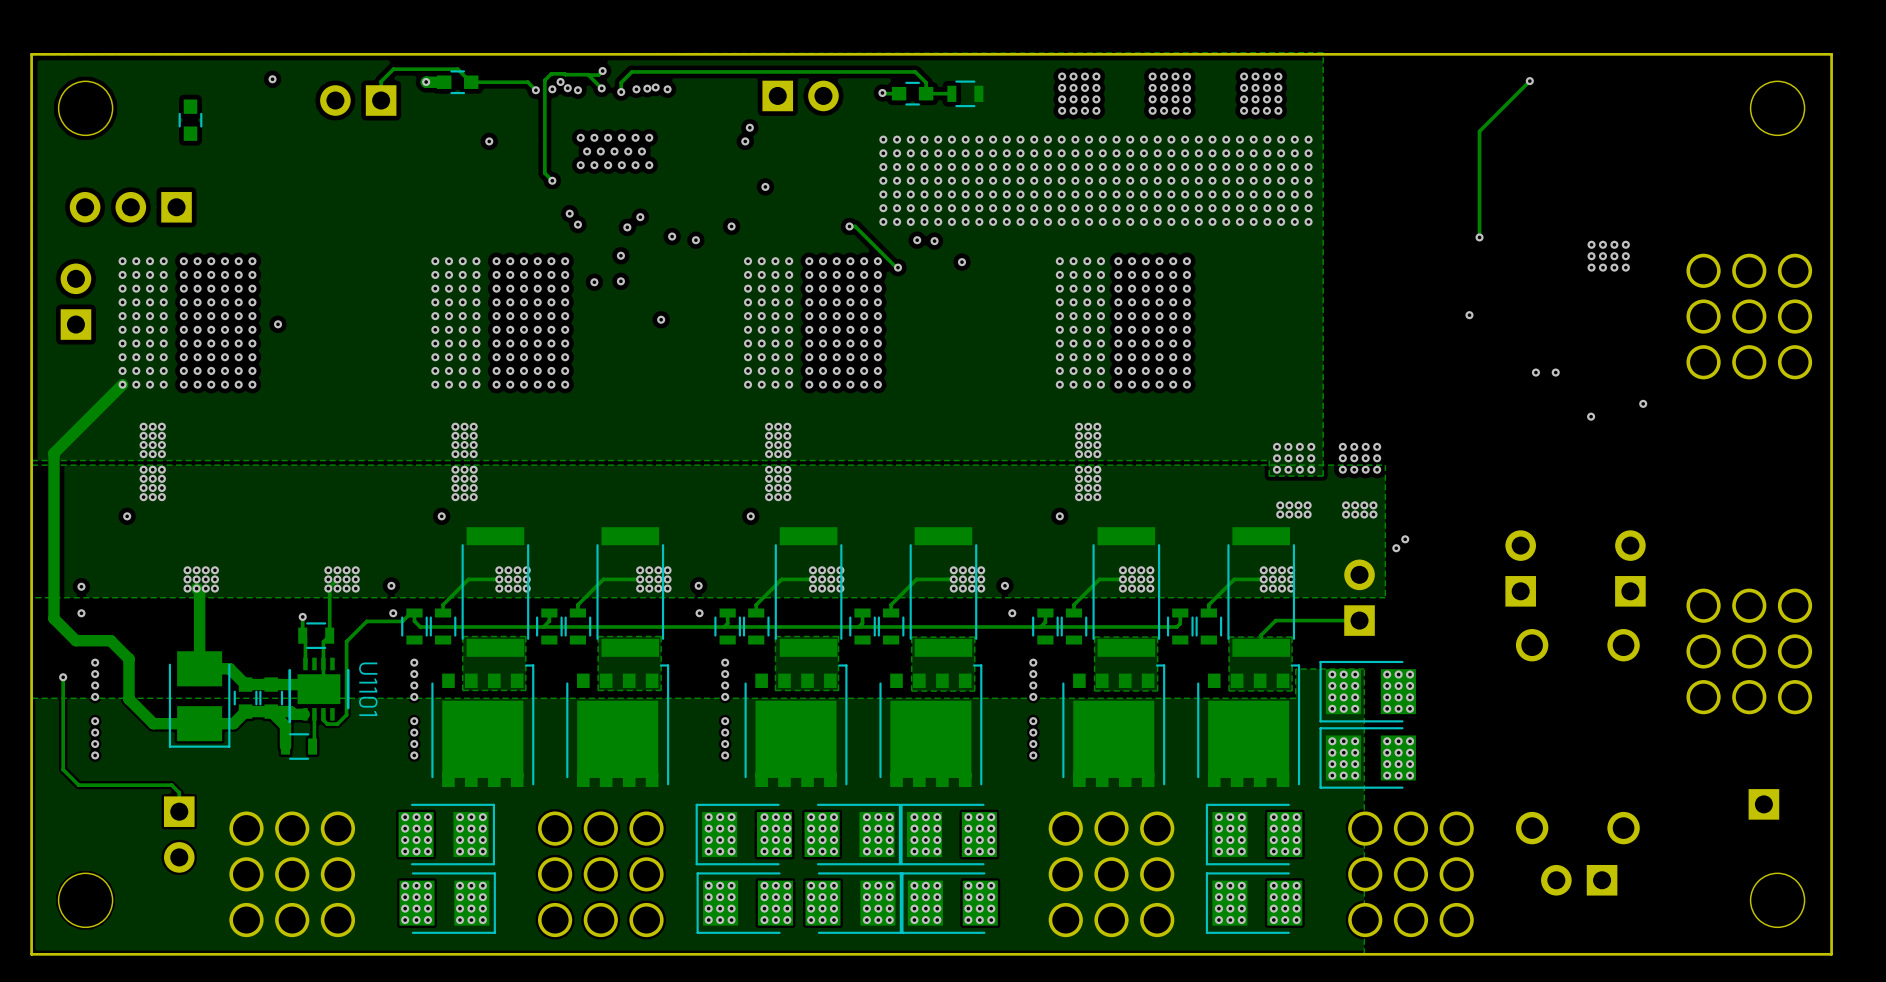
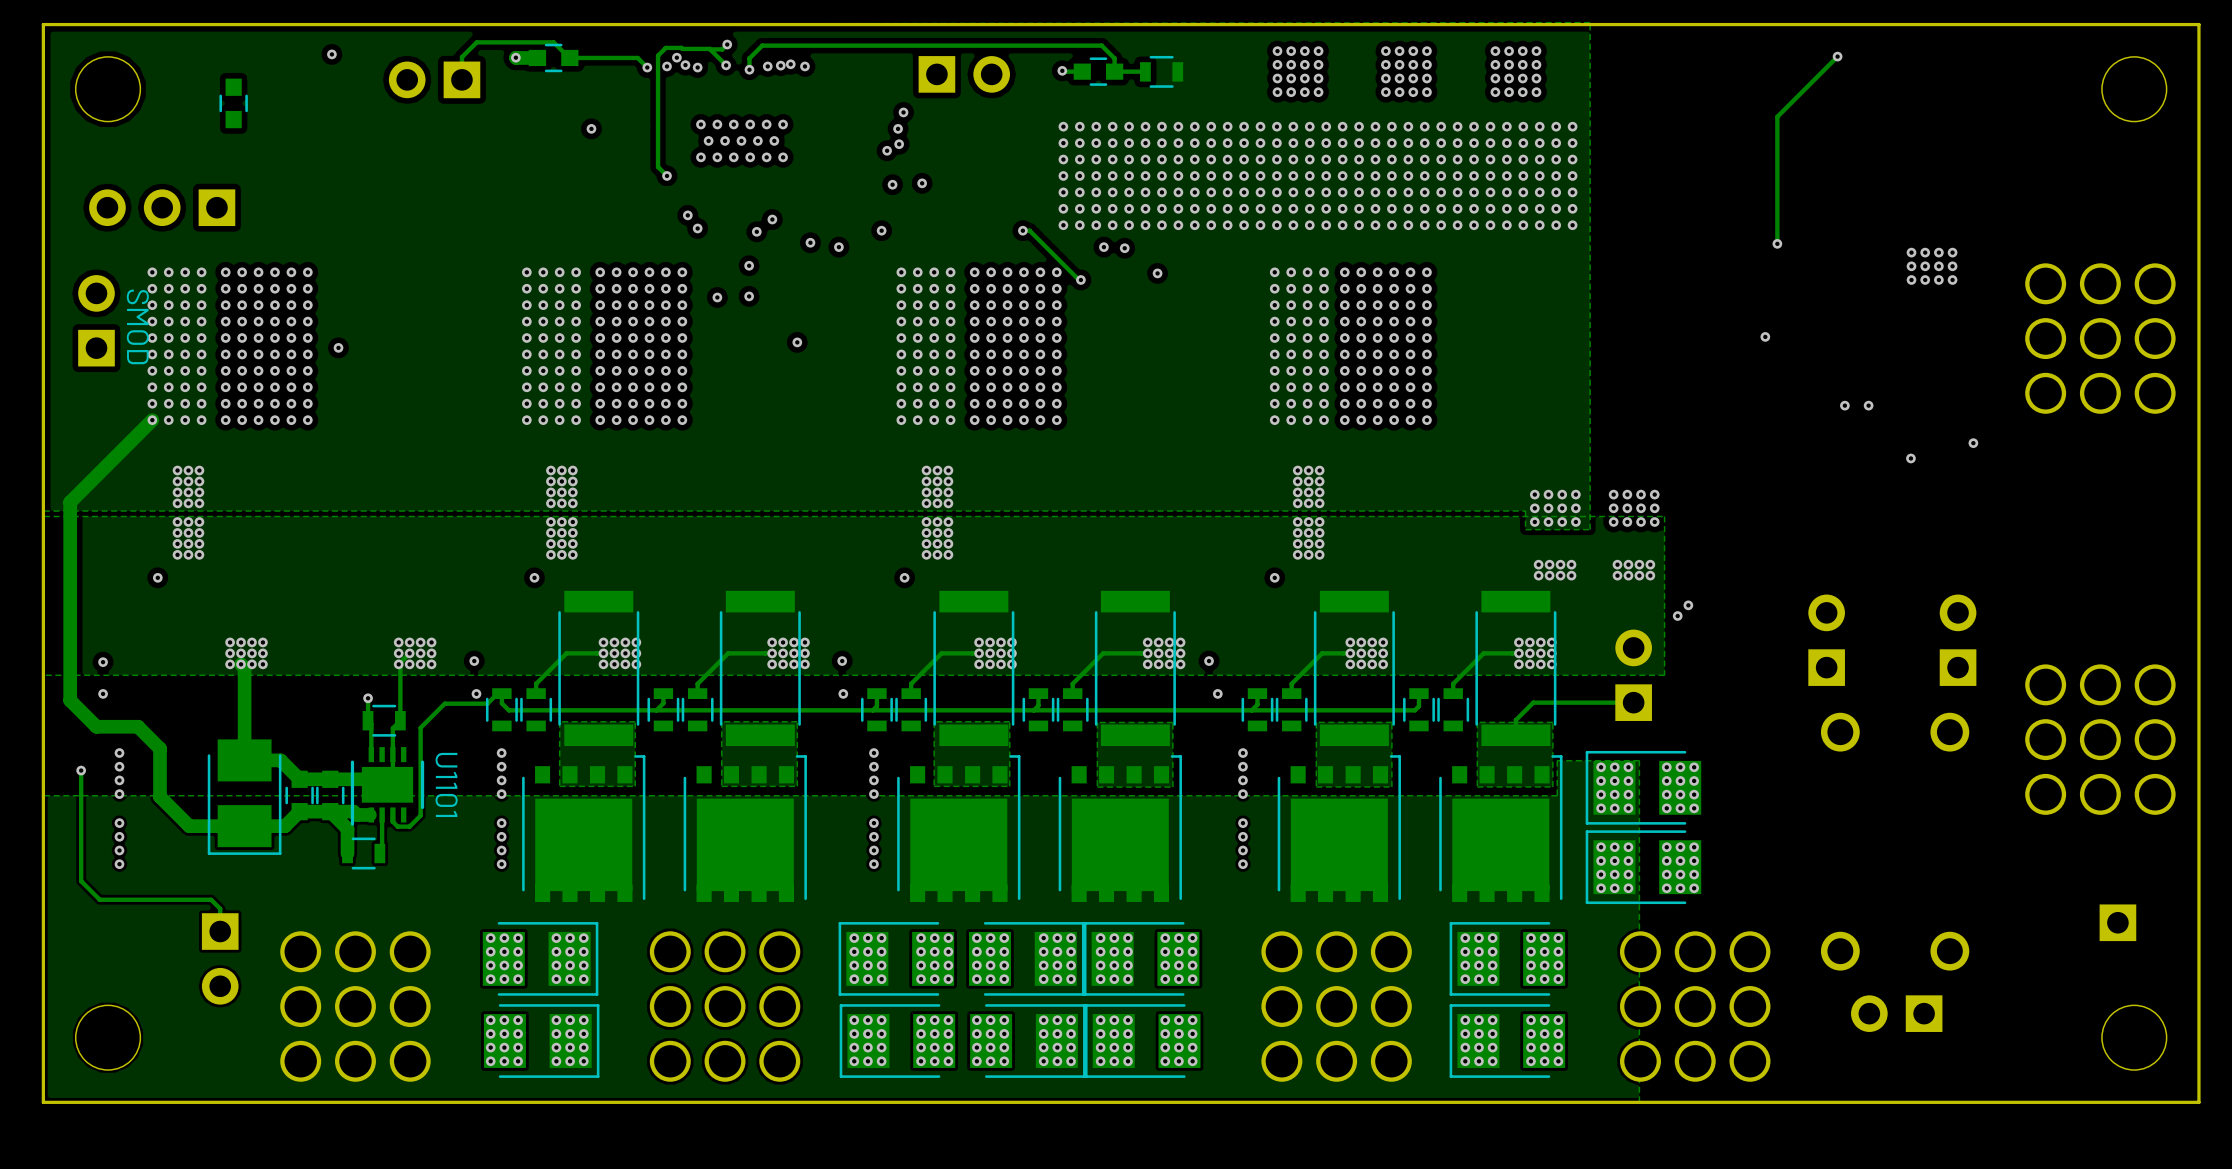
via: none -> (899, 144)
via: none -> (887, 150)
via: none -> (892, 184)
text: none -> SMOD (137, 326)

